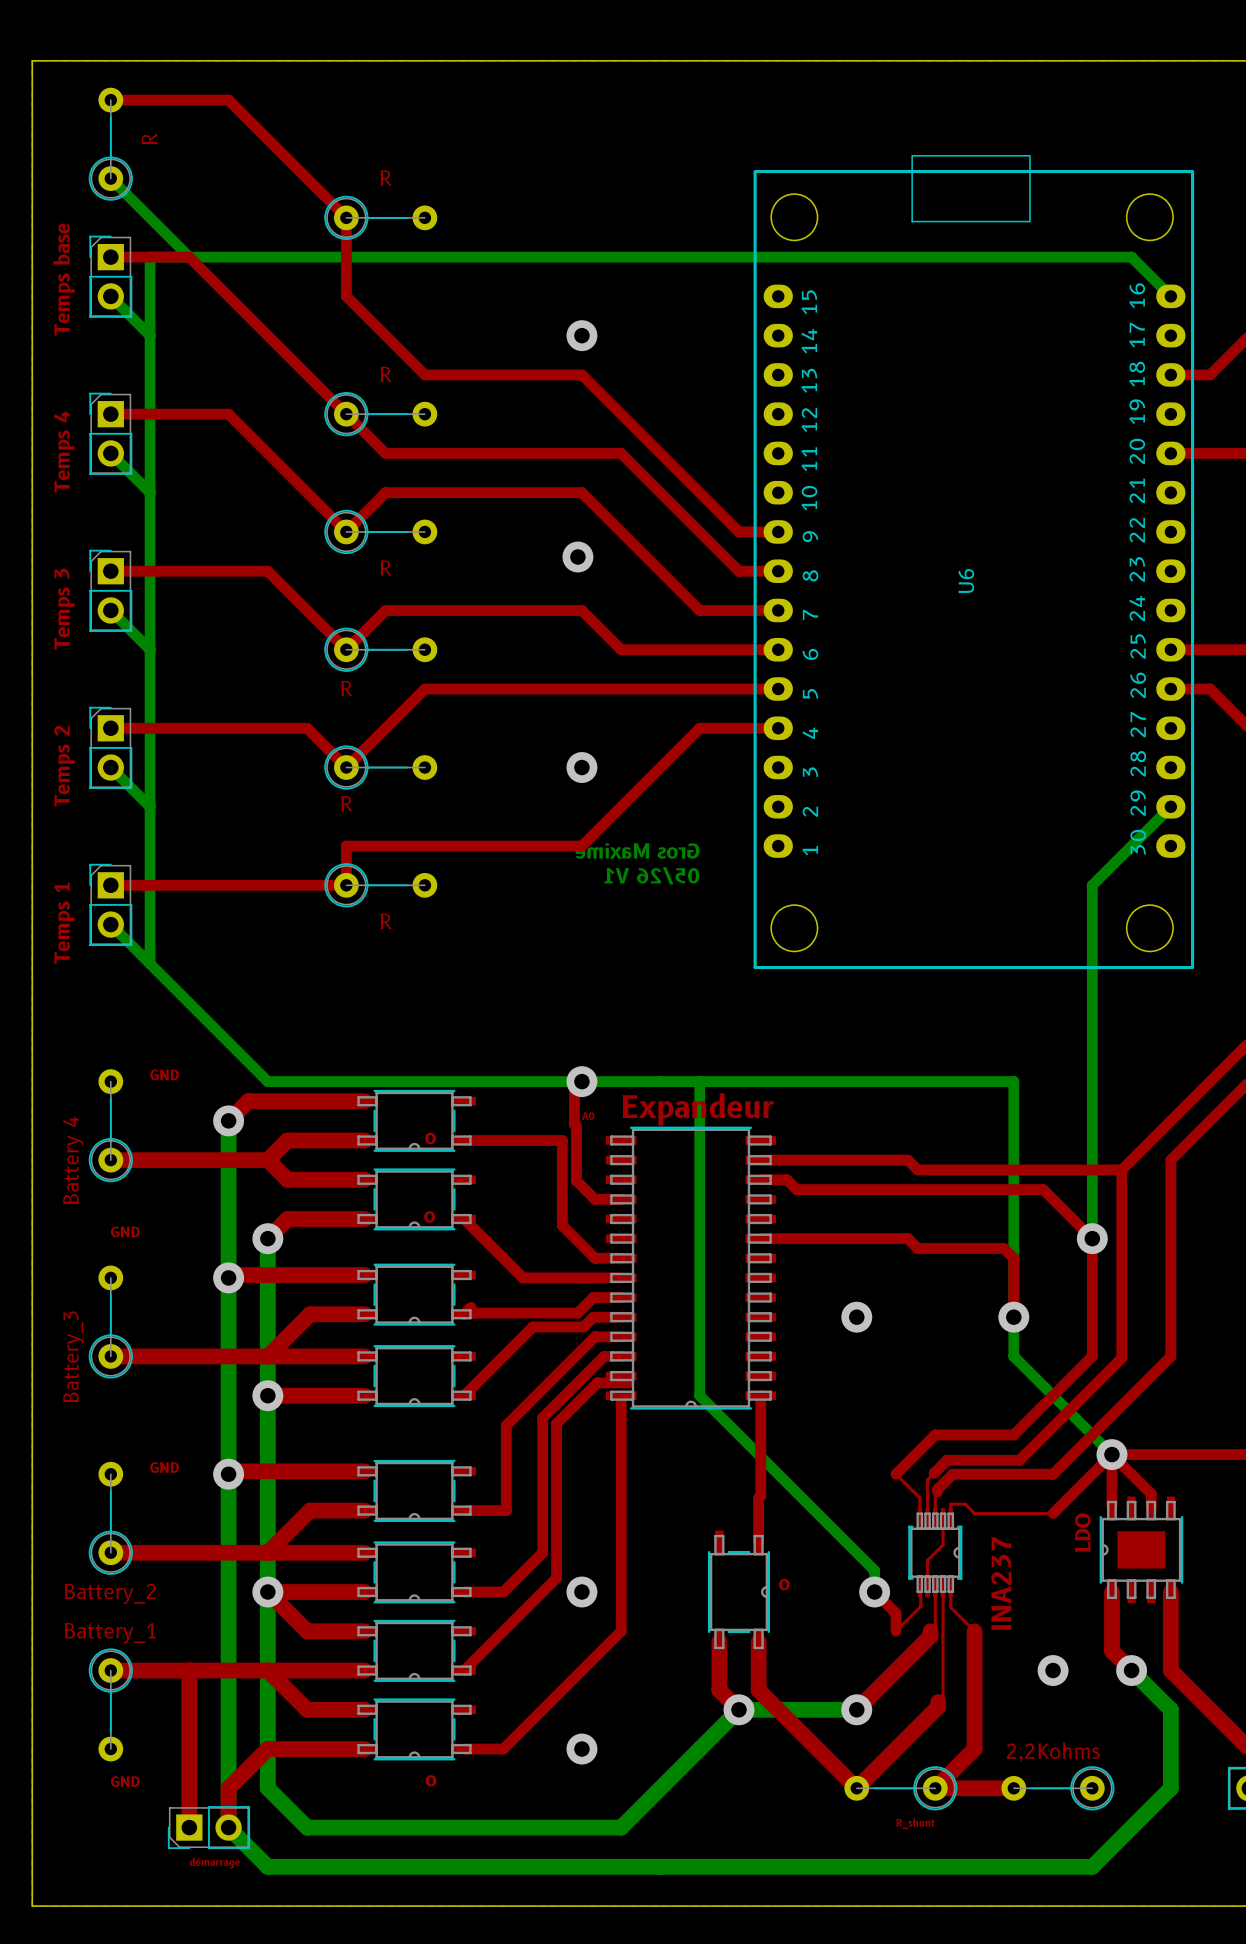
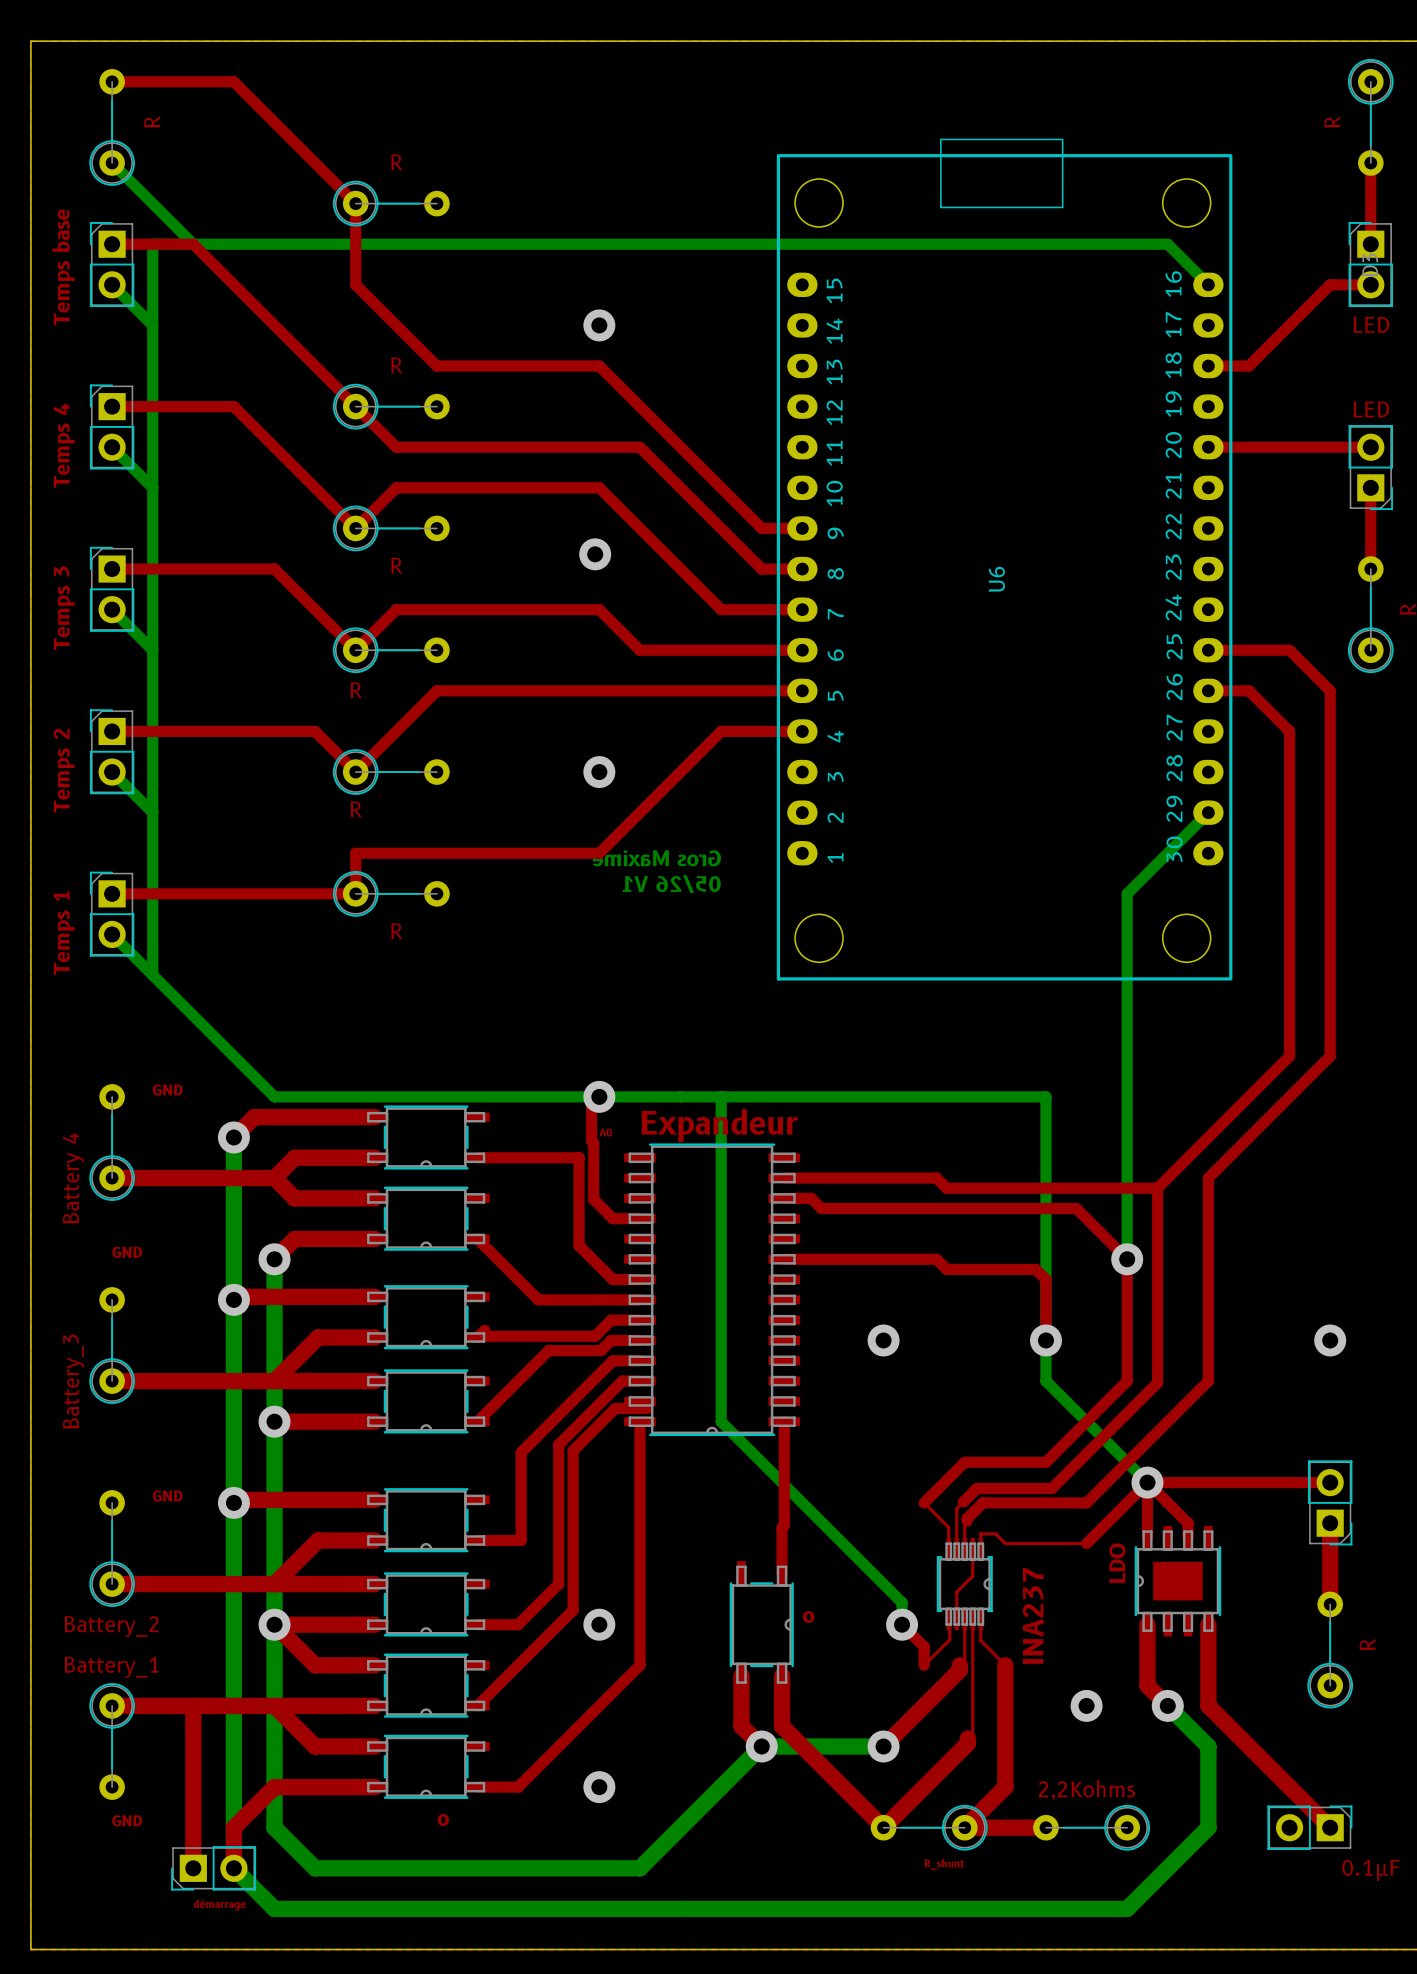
text: o (430, 1138) -> none
text: o (429, 1216) -> none

